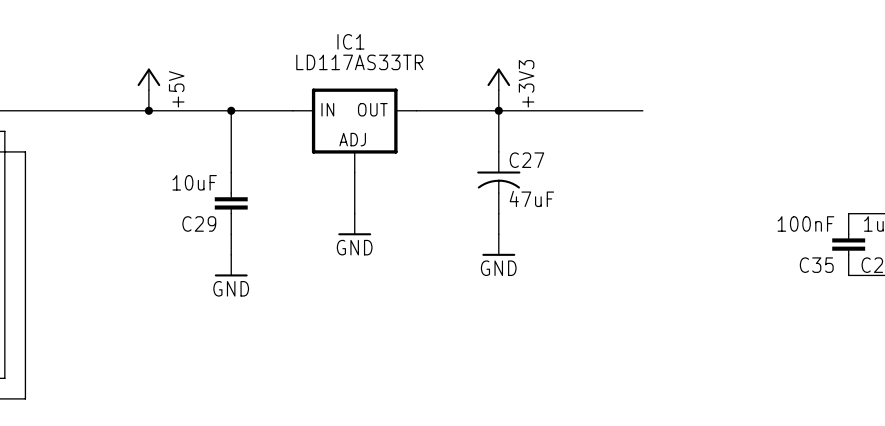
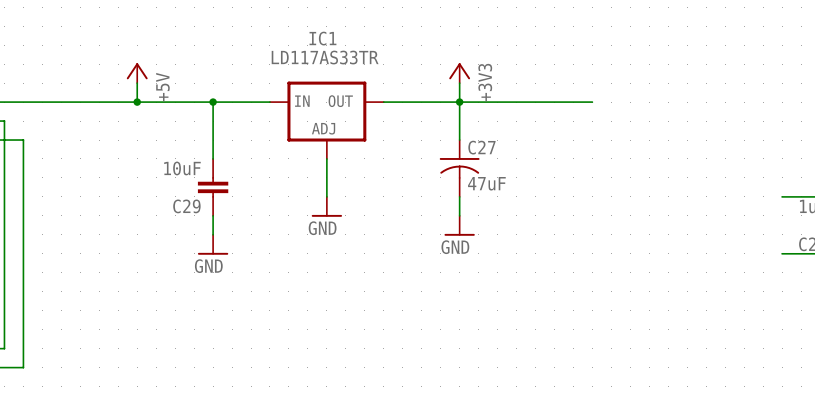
C35: 100nF (848, 244) -> none

